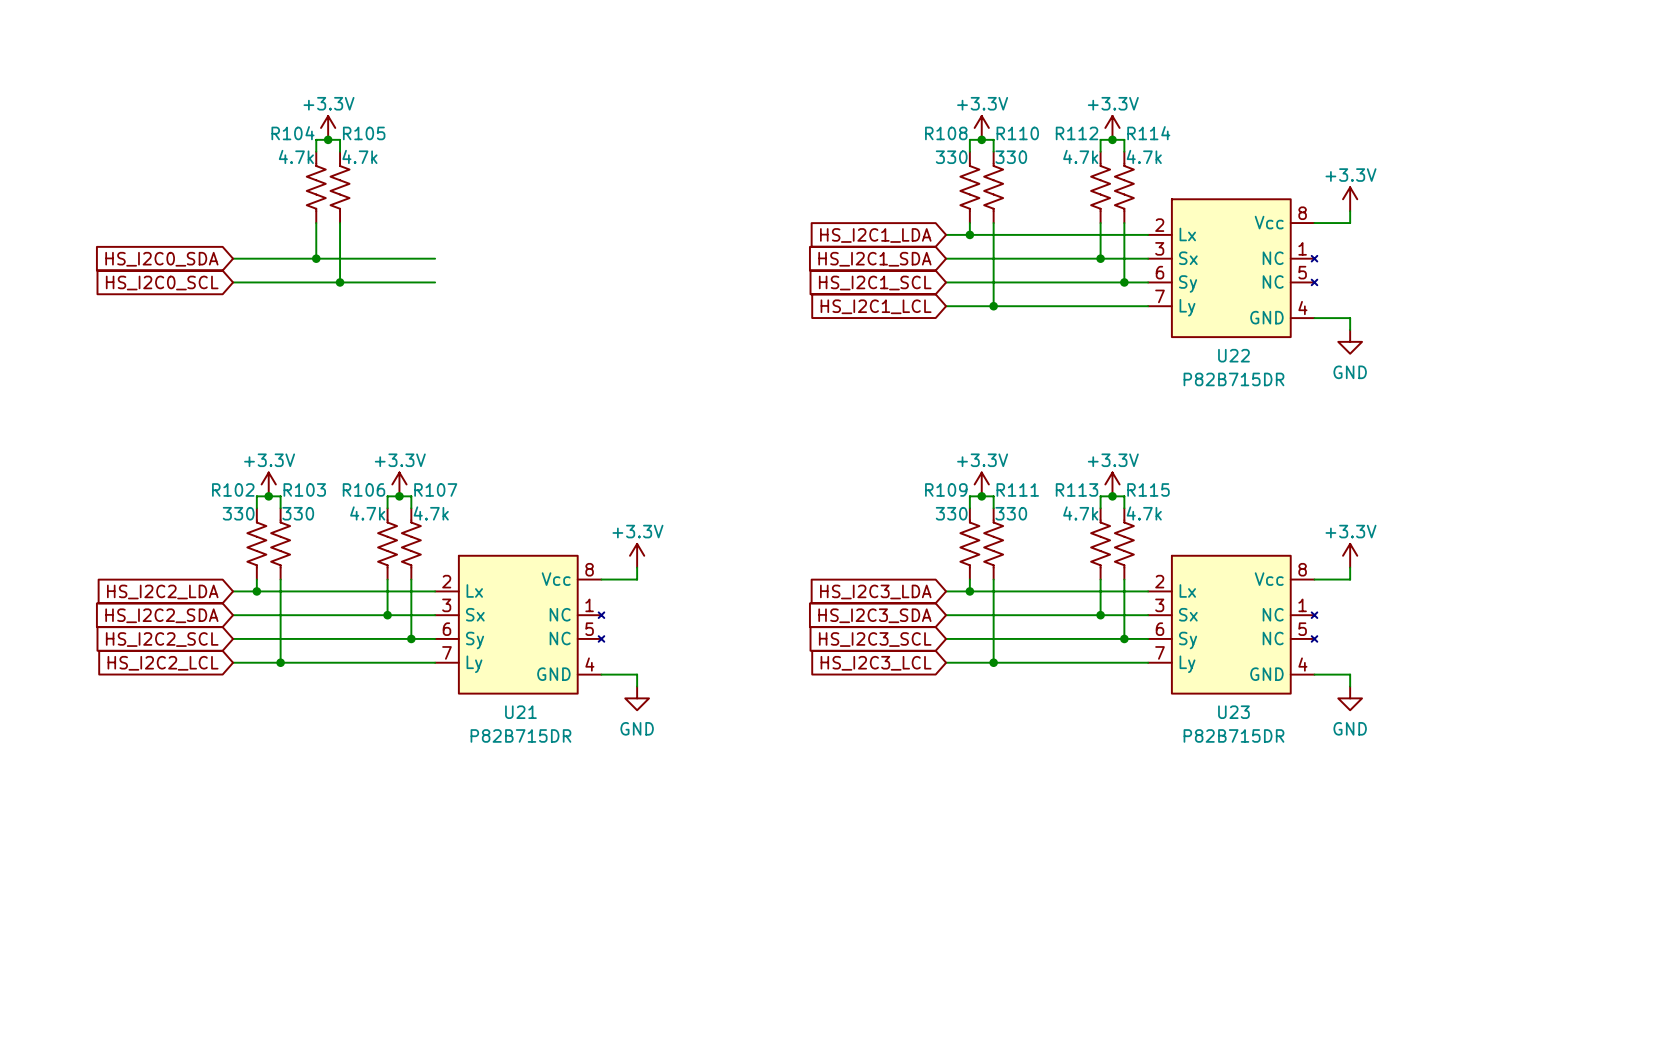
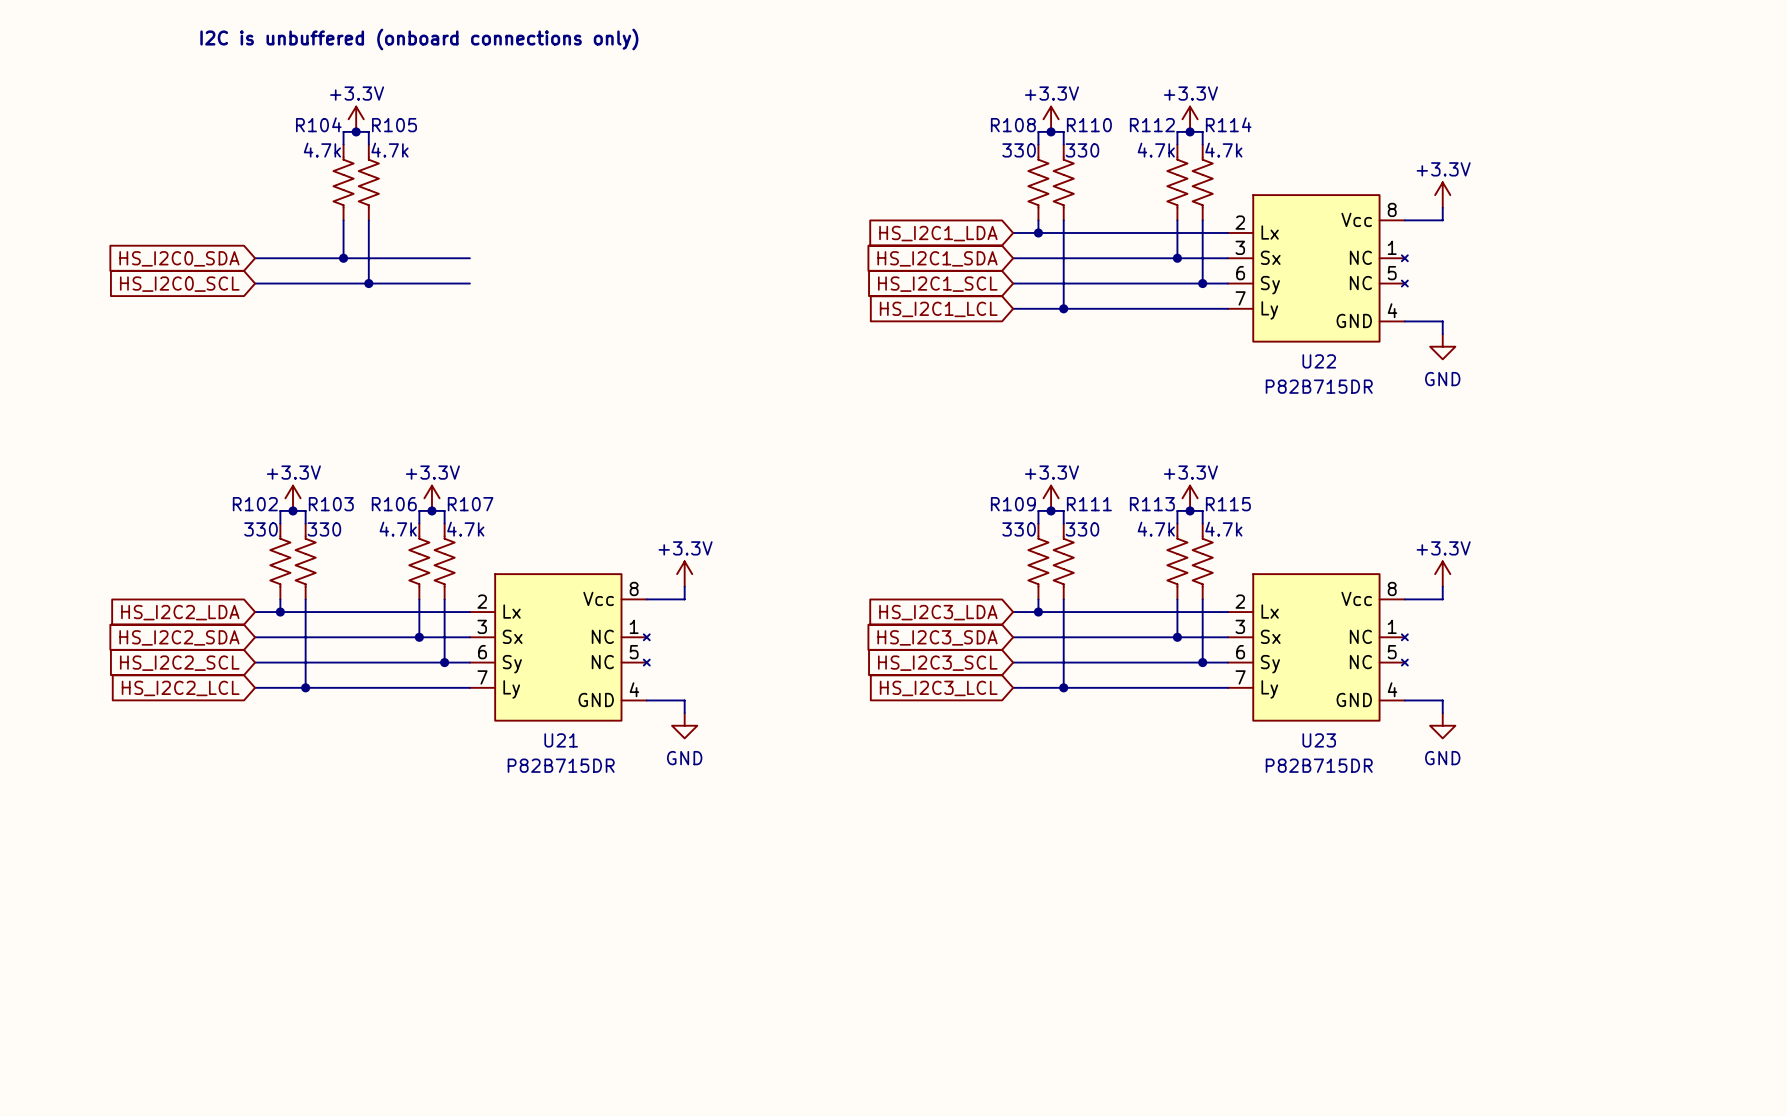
text: none -> I2C is unbuffered (onboard connections only) (419, 39)

